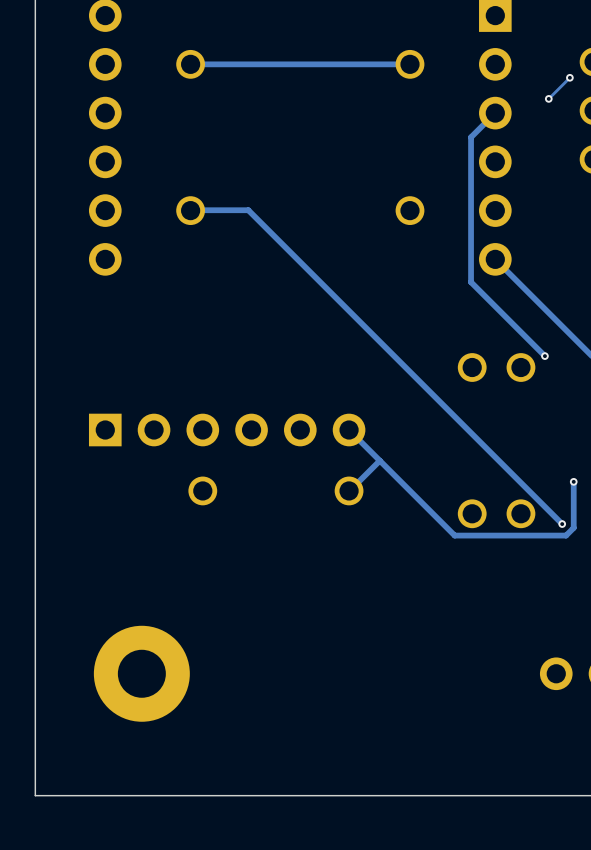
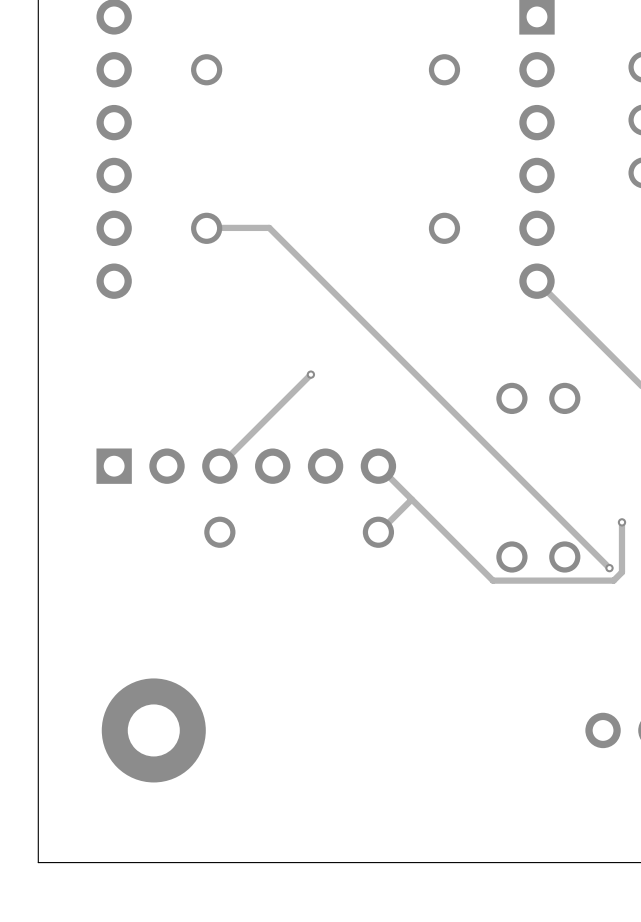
track: (409, 64) (190, 64) -> none
track: (569, 77) (548, 98) -> none
via: (569, 77) -> none
via: (548, 98) -> none
track: (495, 113) (471, 137) (471, 282) (544, 356) -> none
track: none -> (310, 374) (219, 466)
via: none -> (310, 374)
via: (544, 356) -> none

